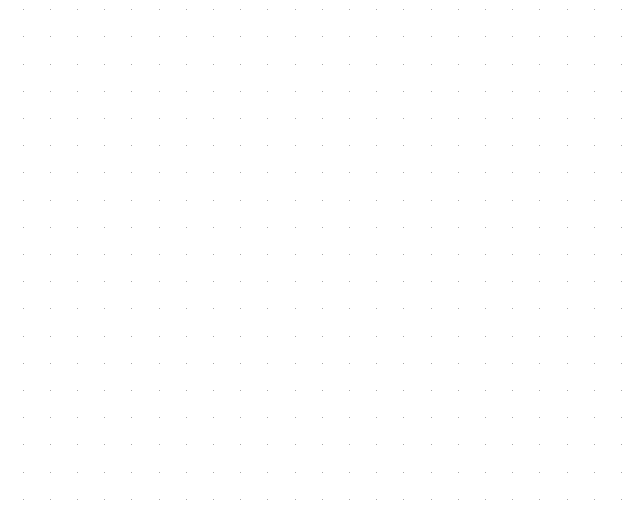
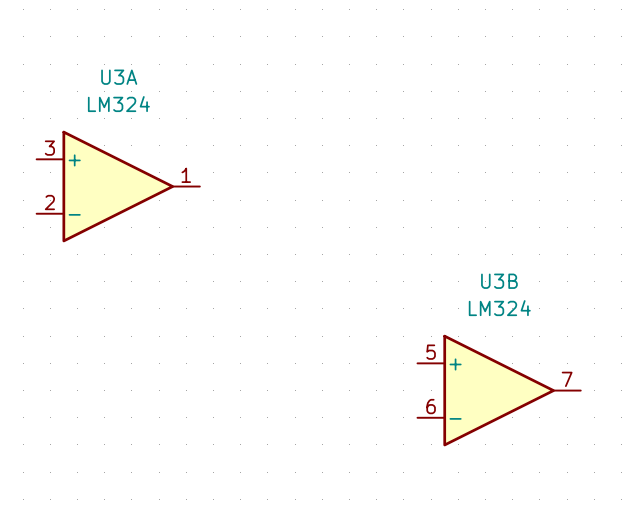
U3A: none -> LM324 (118, 186)
U3B: none -> LM324 (499, 390)

